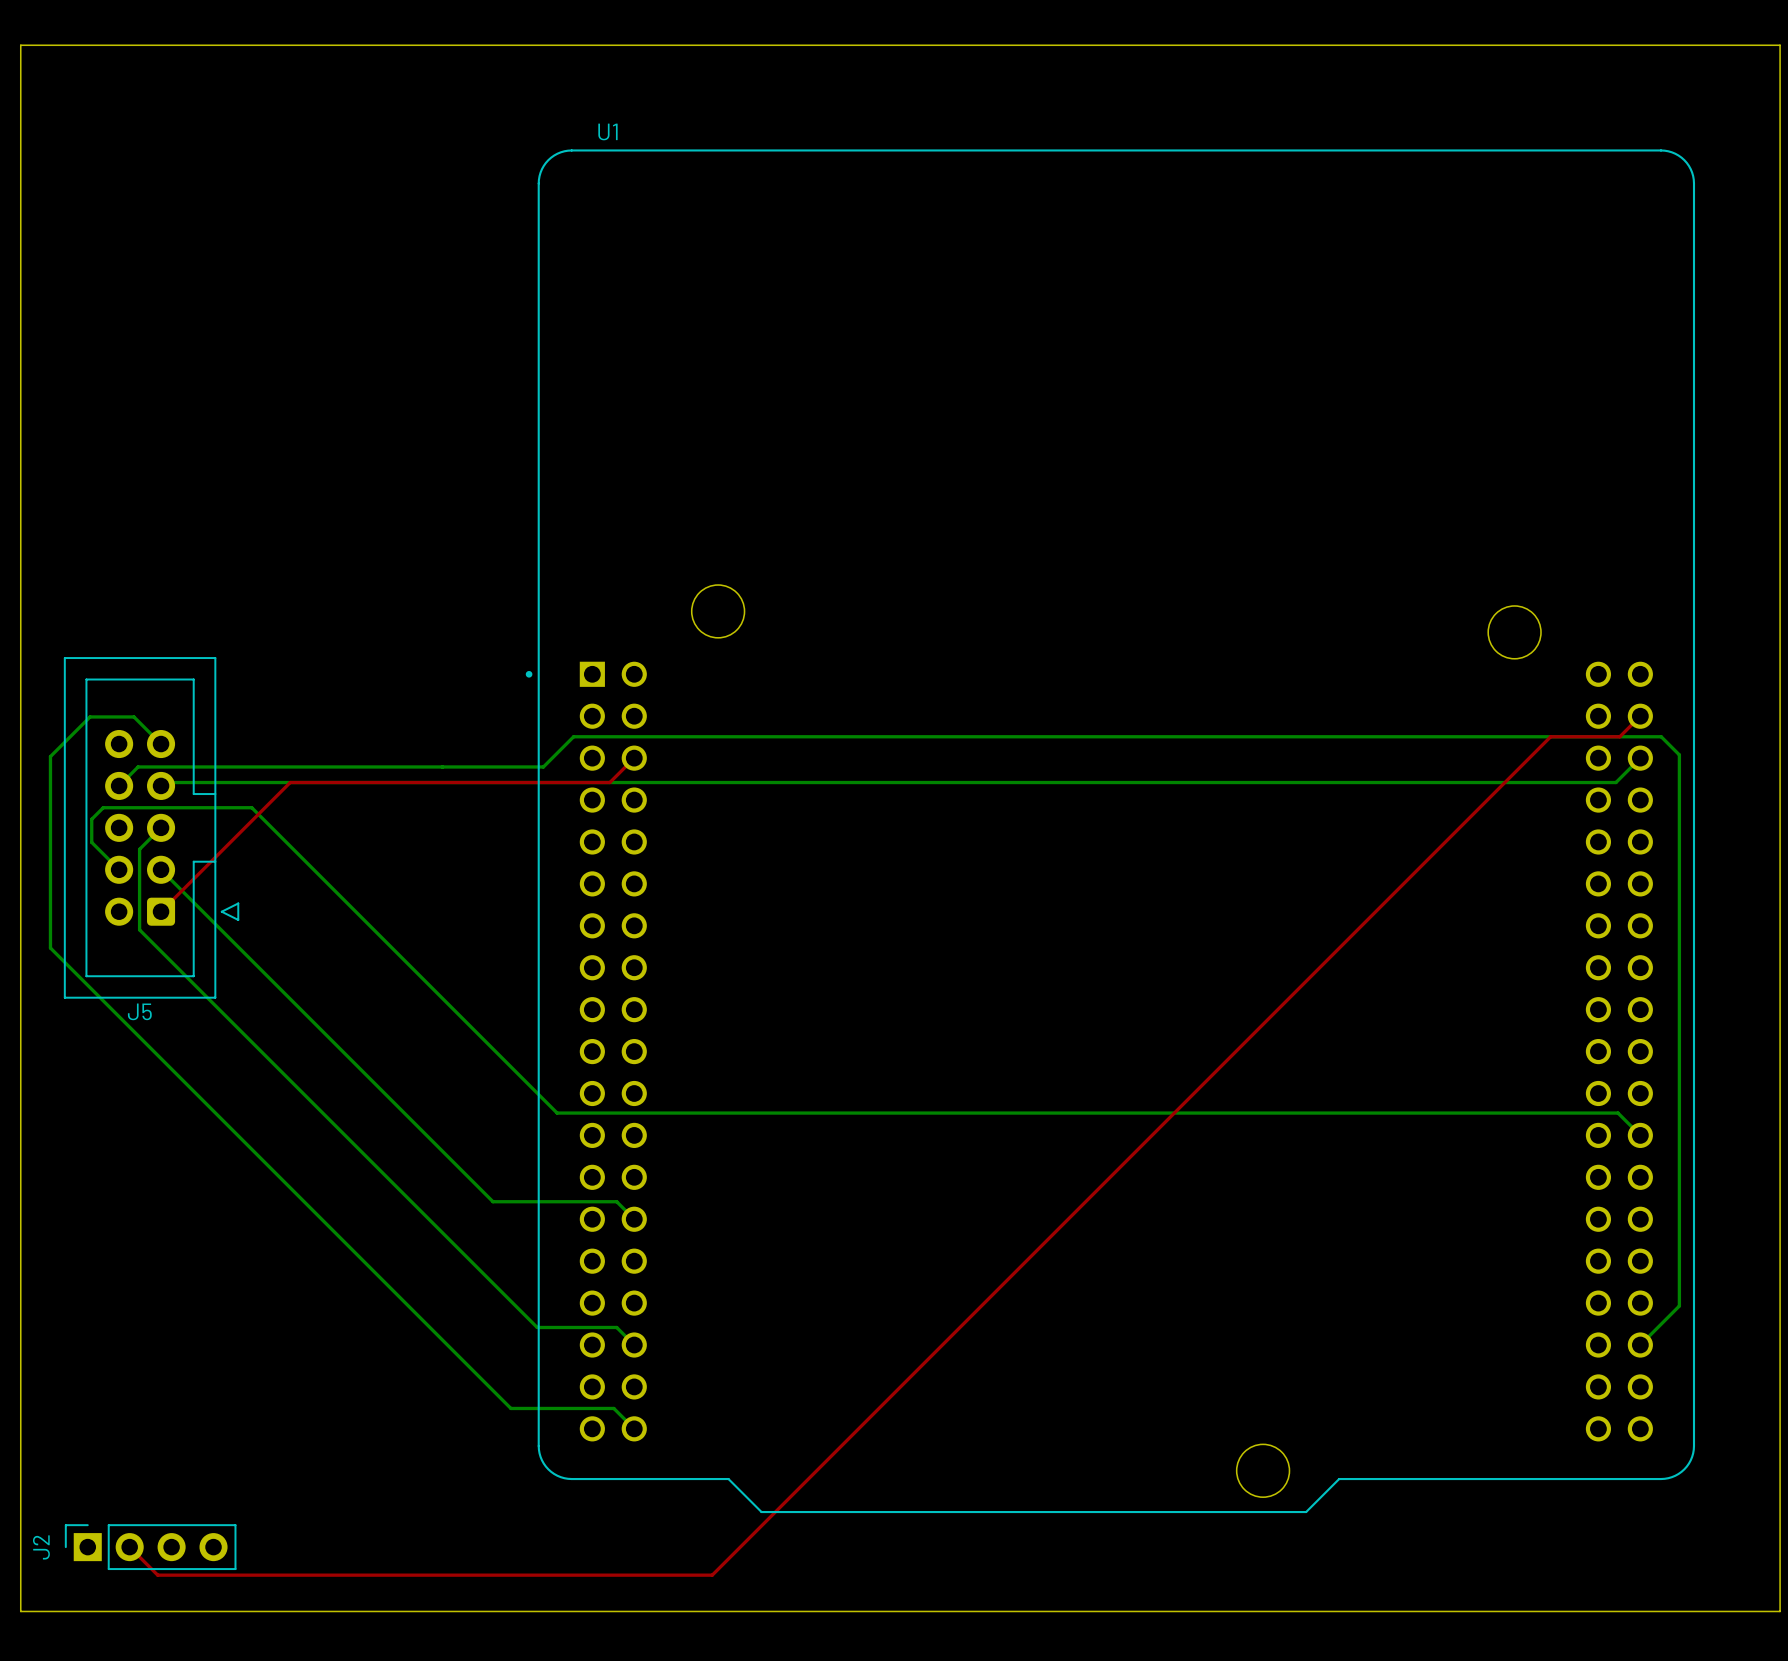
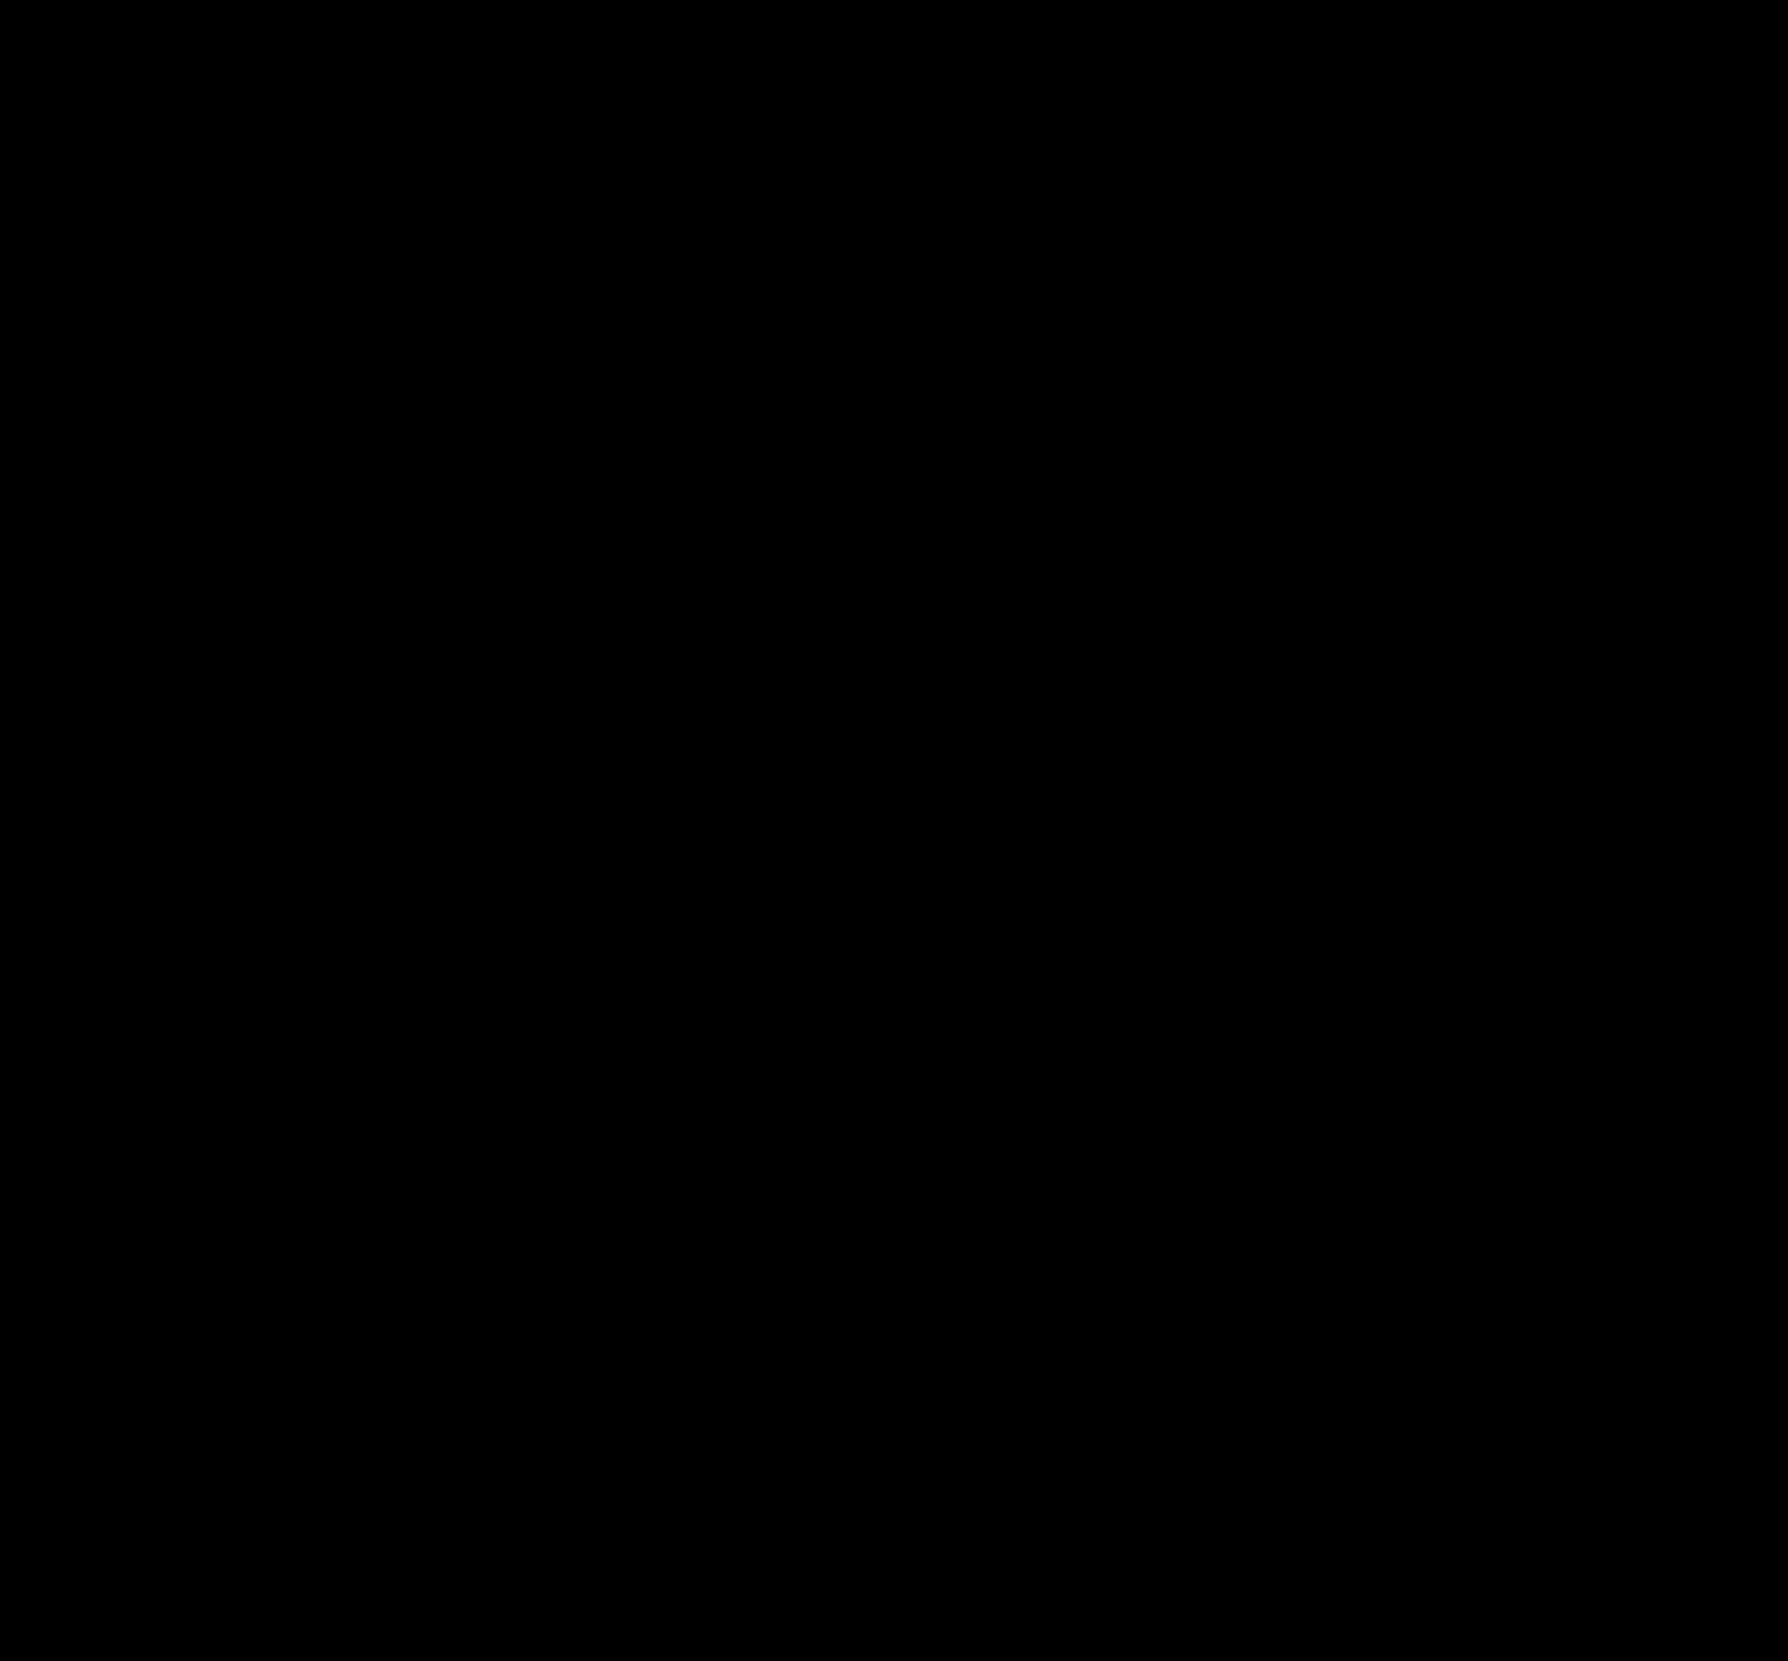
board edge: (20, 45) (1780, 45) (1780, 1611) (20, 1611) (20, 45) -> none
top track: (1640, 716) (1619, 736) (1550, 736) (712, 1575) (157, 1575) (129, 1547) -> none
bottom track: (161, 744) (133, 716) (90, 716) (50, 756) (50, 948) (510, 1408) (613, 1408) (634, 1428) -> none
top track: (634, 758) (609, 782) (290, 782) (161, 911) -> none
bottom track: (1640, 758) (1615, 782) (164, 782) (161, 785) -> none
bottom track: (119, 785) (138, 766) (543, 766) (573, 736) (1661, 736) (1679, 754) (1679, 1305) (1640, 1345) -> none
J5: (151, 827) -> none
bottom track: (161, 827) (139, 849) (139, 929) (537, 1327) (616, 1327) (634, 1345) -> none
U1: (1110, 831) -> none
bottom track: (119, 869) (91, 842) (91, 819) (103, 807) (251, 807) (557, 1113) (1618, 1113) (1640, 1135) -> none
bottom track: (161, 869) (492, 1201) (616, 1201) (634, 1219) -> none
J2: (150, 1547) -> none

